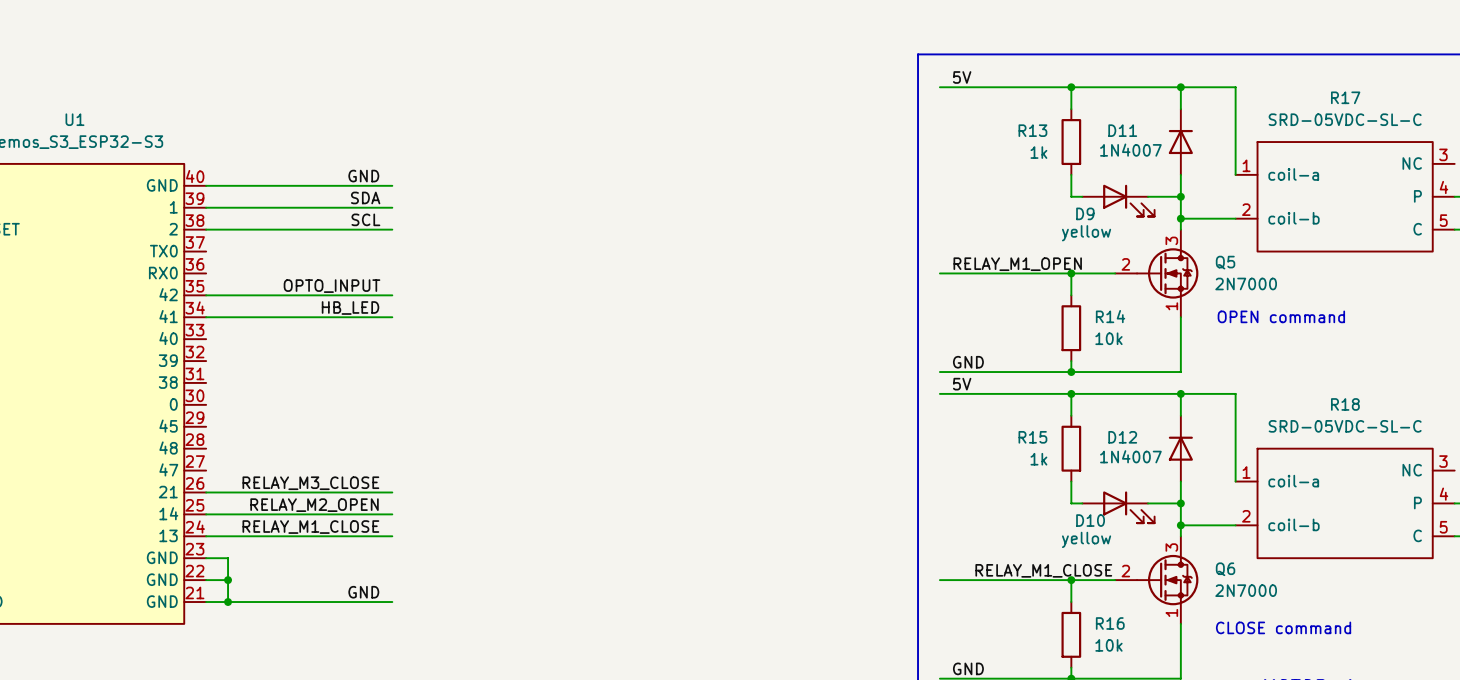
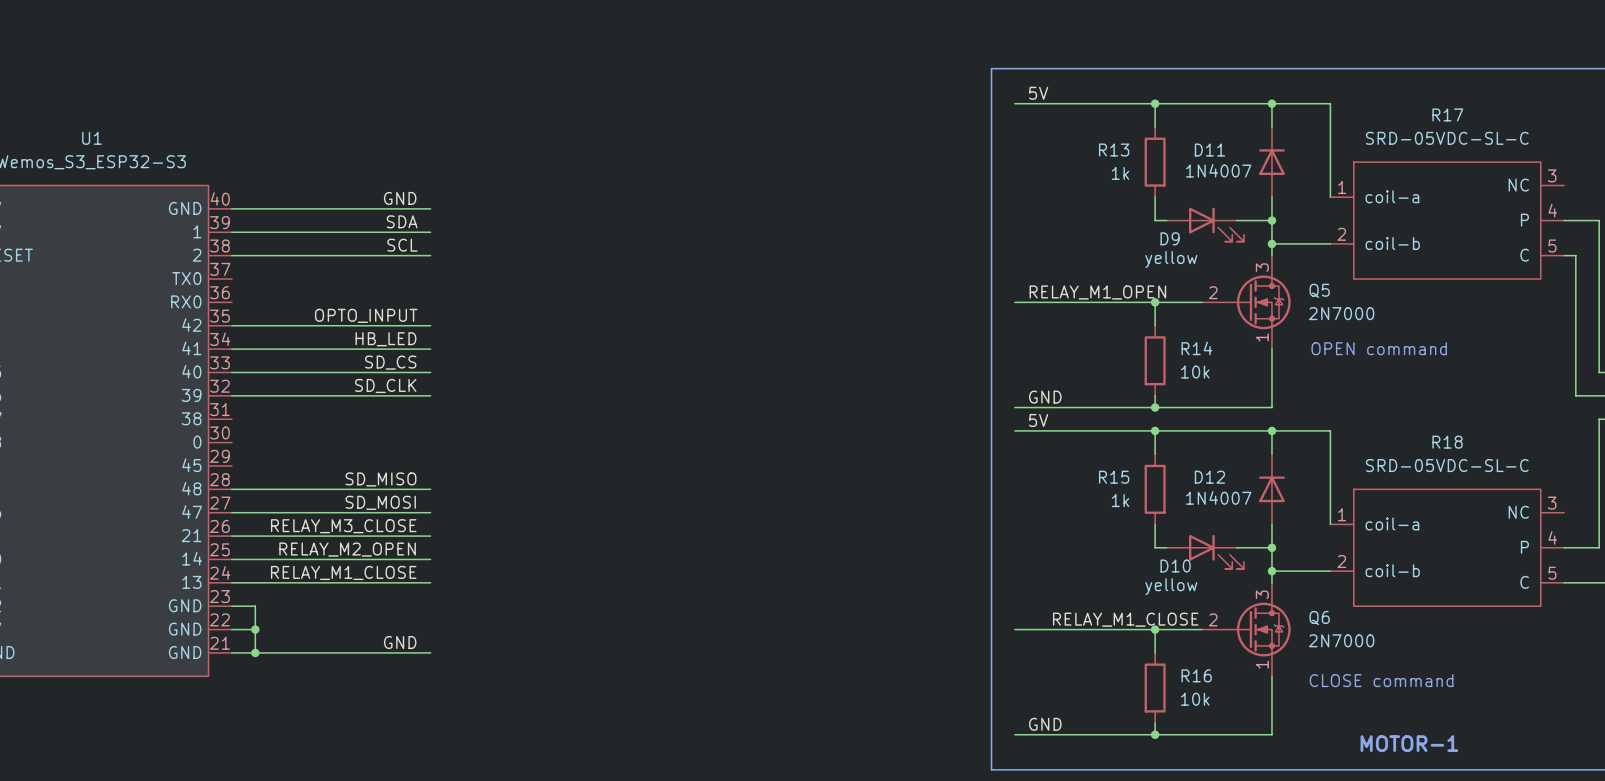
label: none -> SD_CS (390, 362)
wire: none -> (231, 372) (430, 372)
label: none -> SD_CLK (385, 385)
wire: none -> (231, 395) (430, 395)
label: none -> SD_MISO (380, 479)
wire: none -> (231, 489) (430, 489)
label: none -> SD_MOSI (380, 502)
wire: none -> (231, 512) (430, 512)

